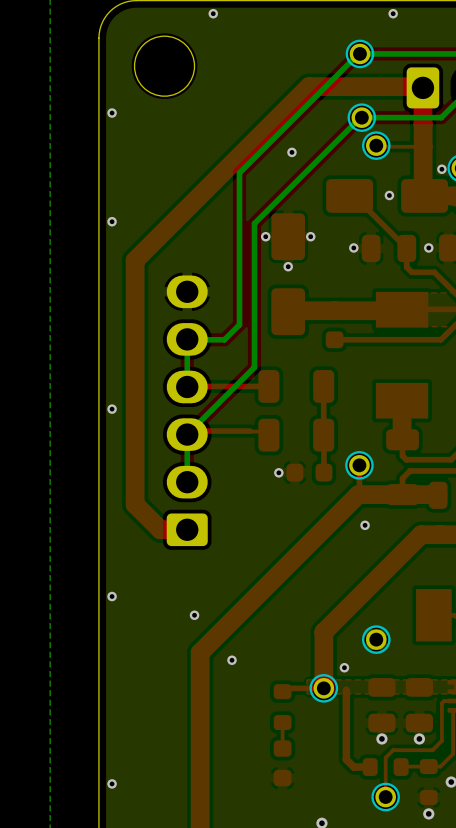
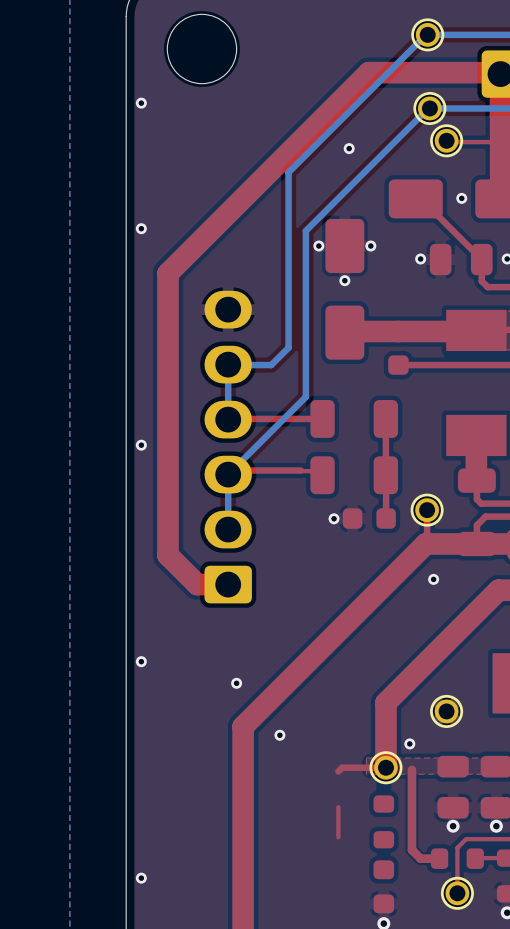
part position: (282, 707) -> (383, 821)
part position: (282, 763) -> (383, 886)

